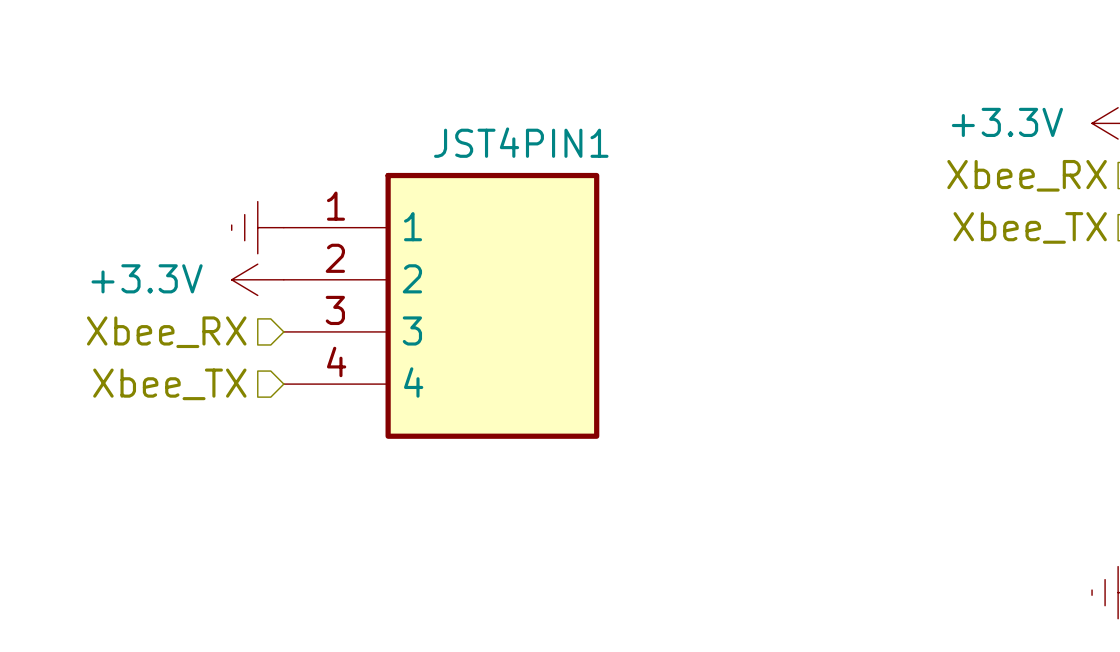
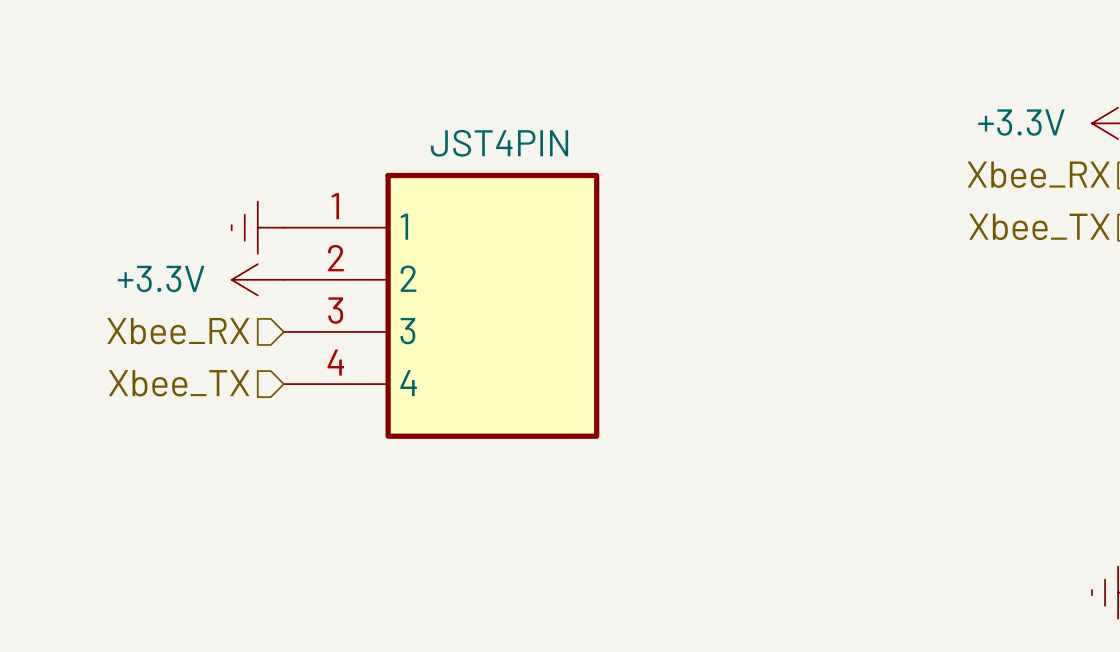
JST4PIN1 name: JST4PIN1 (521, 142) -> JST4PIN (499, 143)

